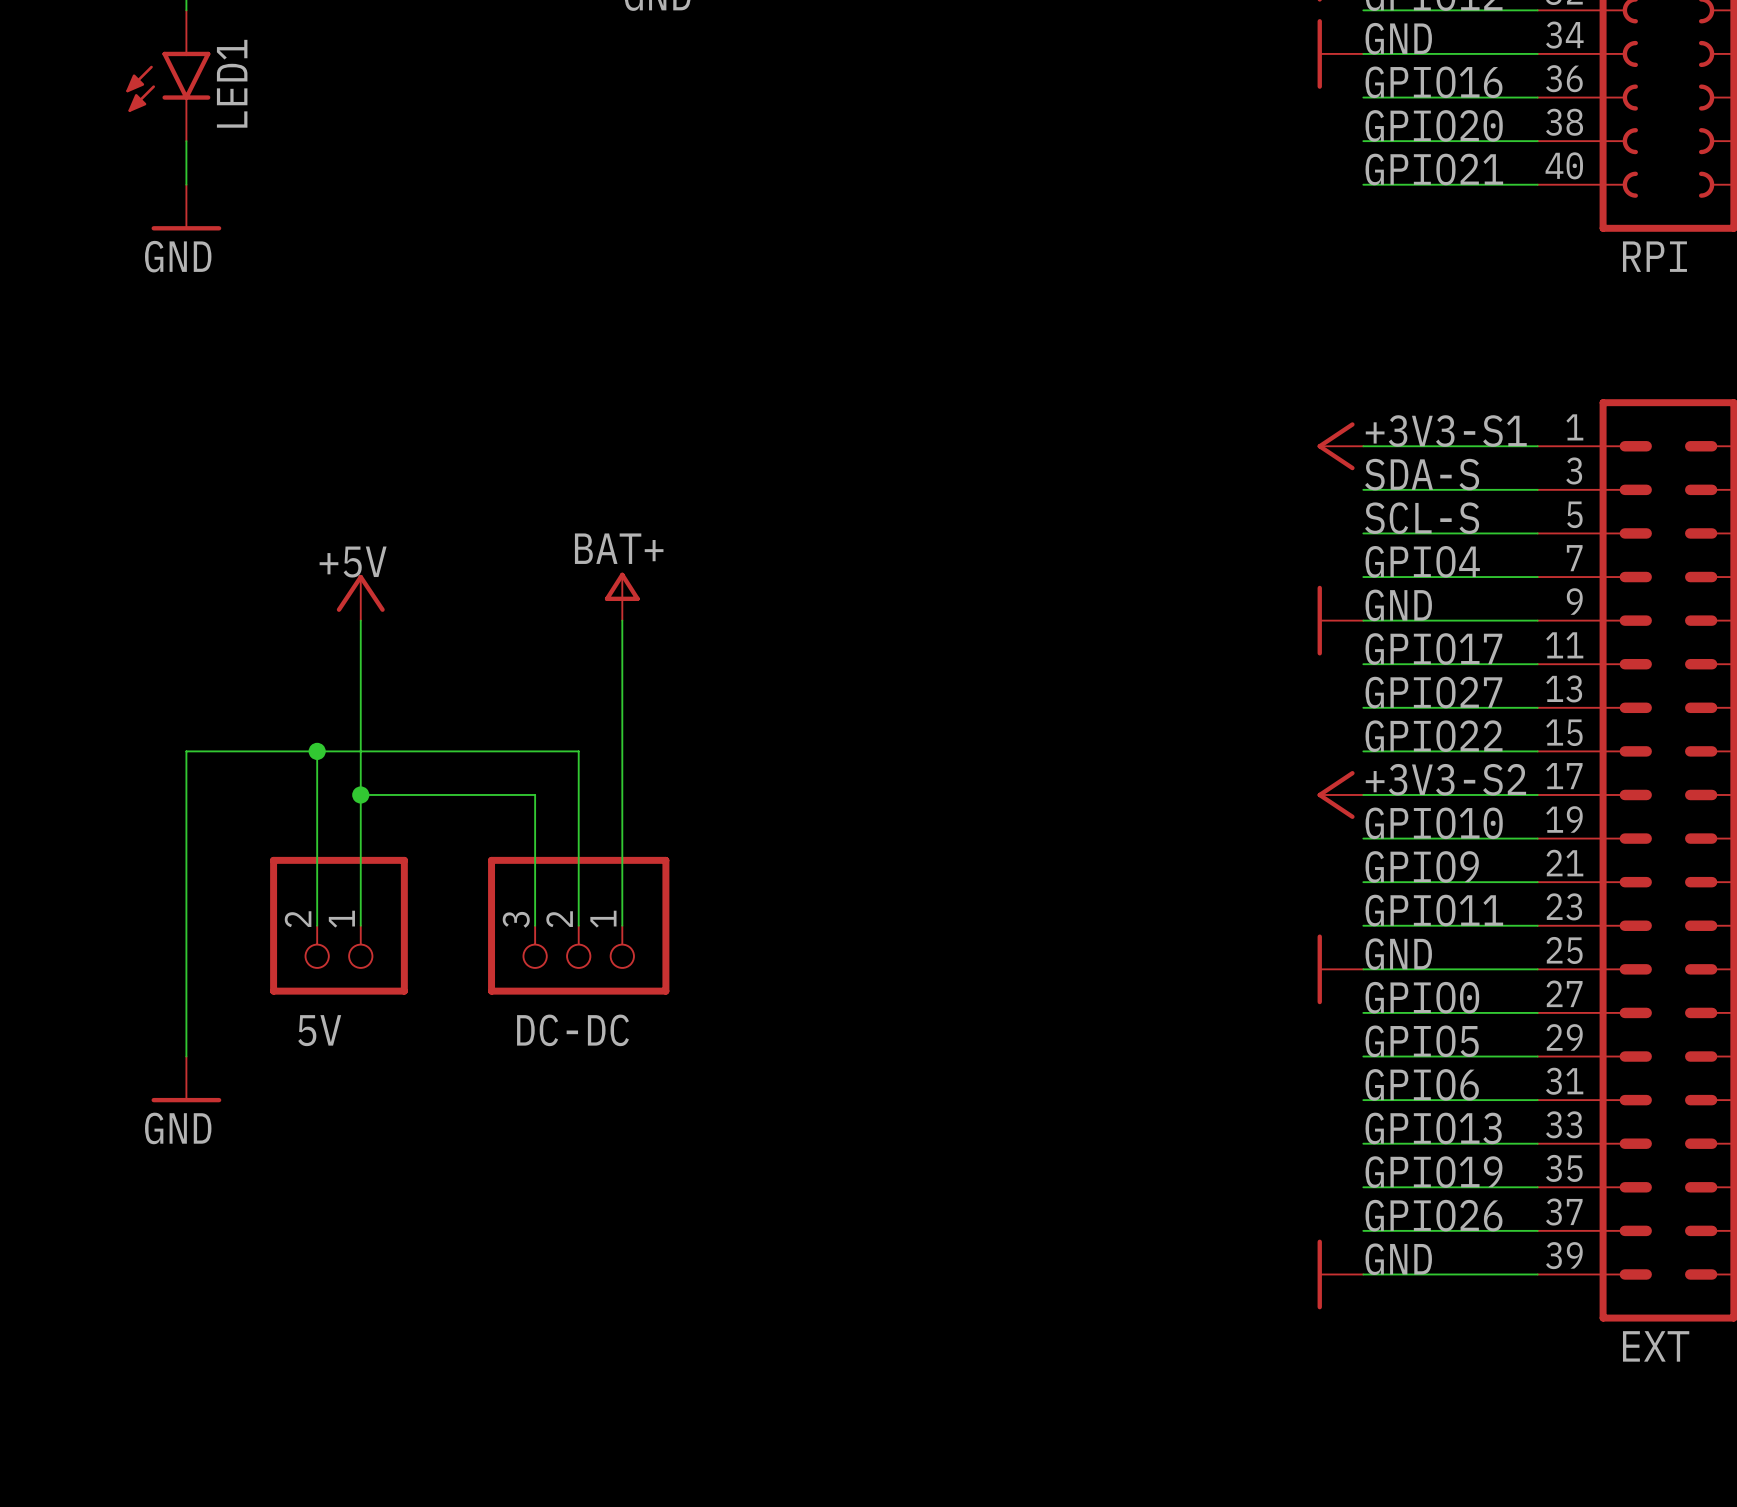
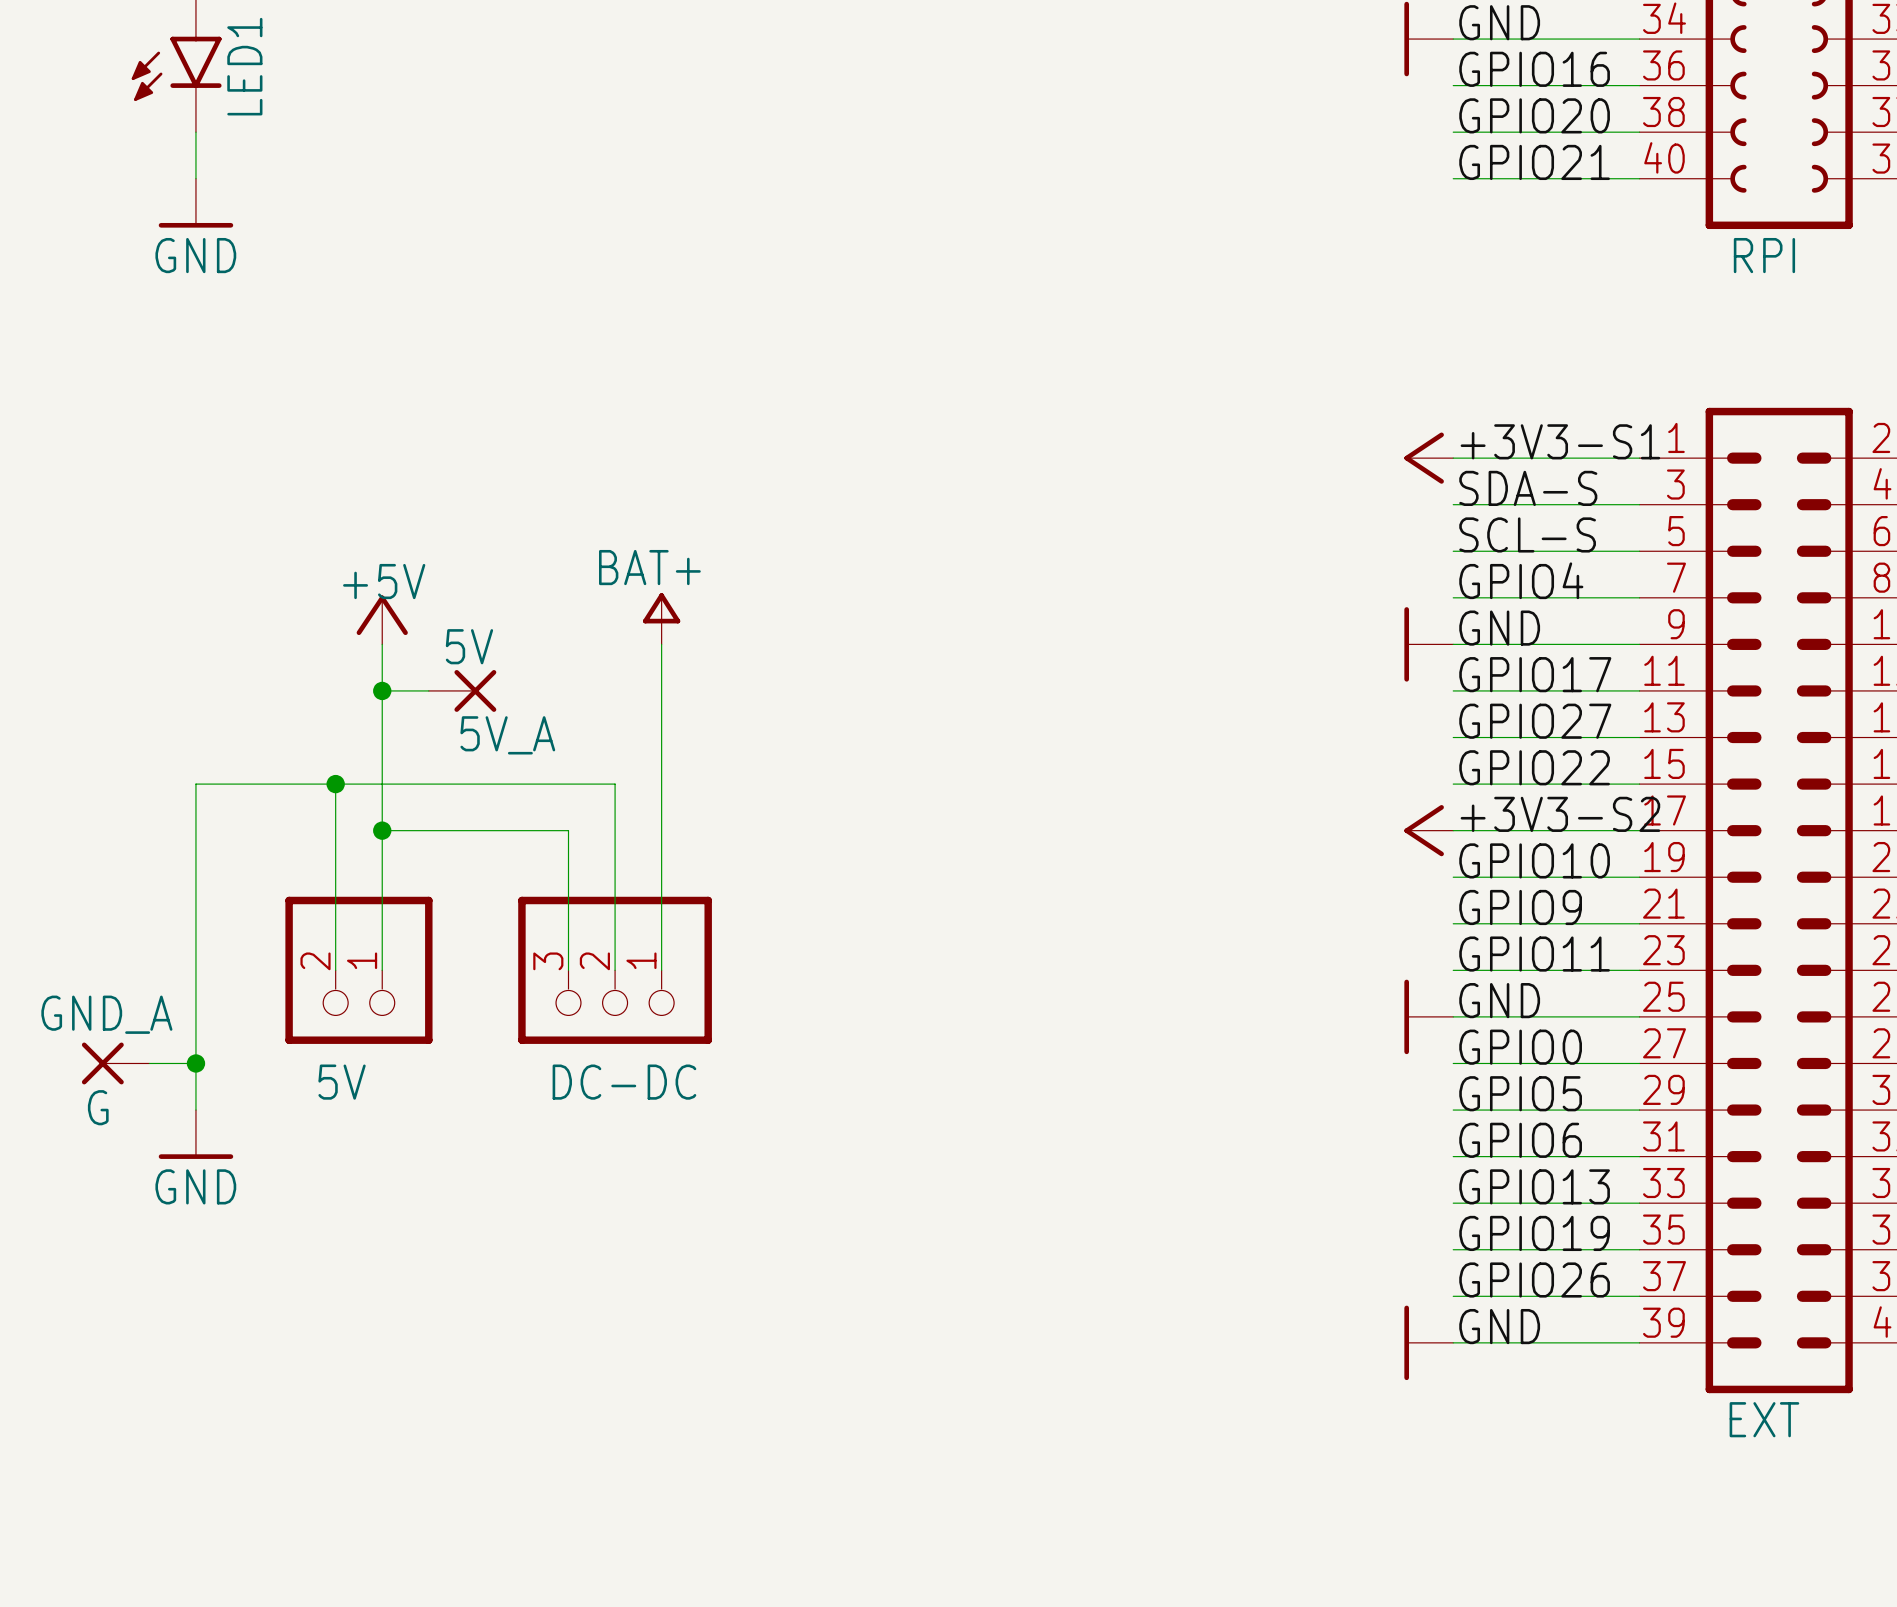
wire: none -> (382, 690) (428, 690)
junction: none -> (382, 690)
5V_A: none -> 5V (462, 690)
GND_A: none -> G (115, 1063)
wire: none -> (149, 1063) (195, 1063)
junction: none -> (195, 1063)

